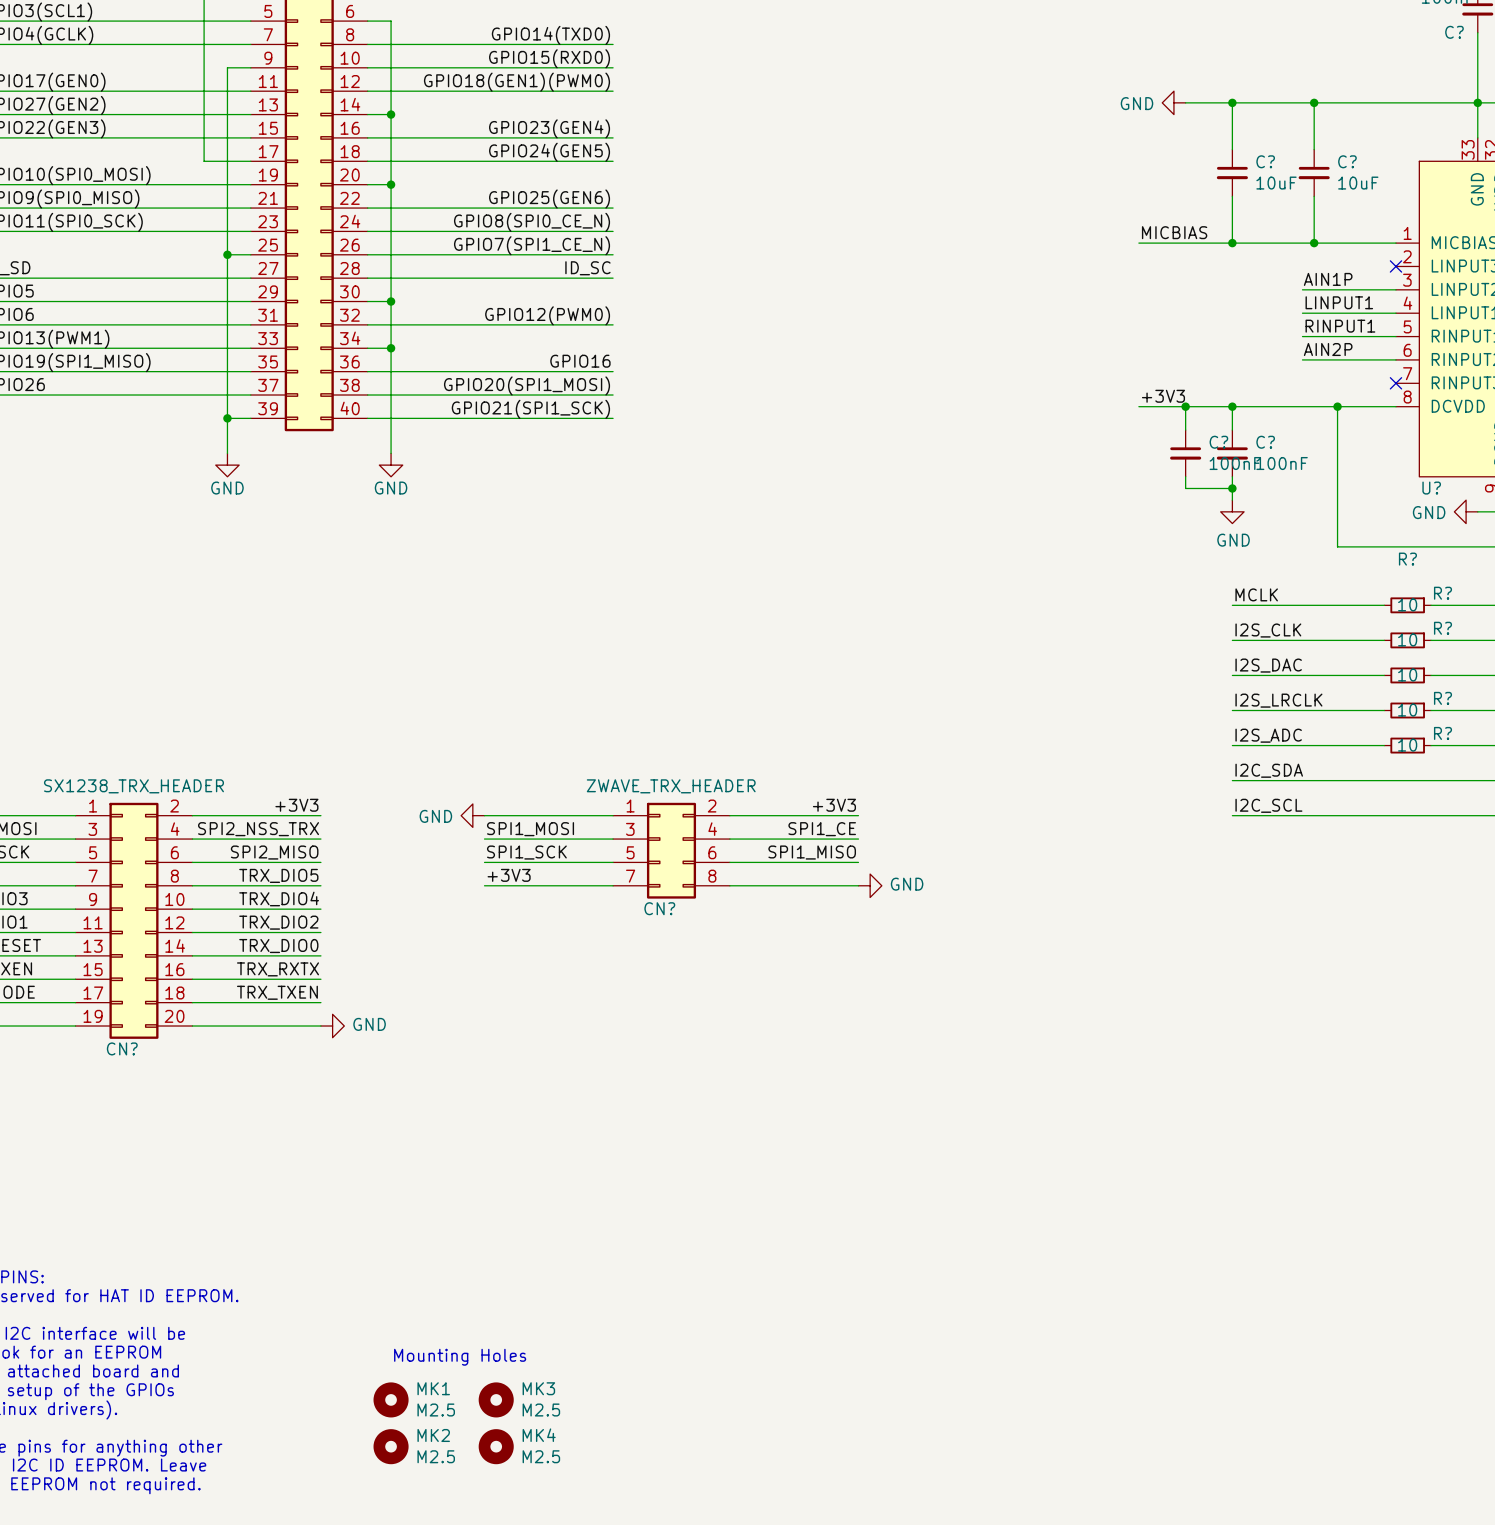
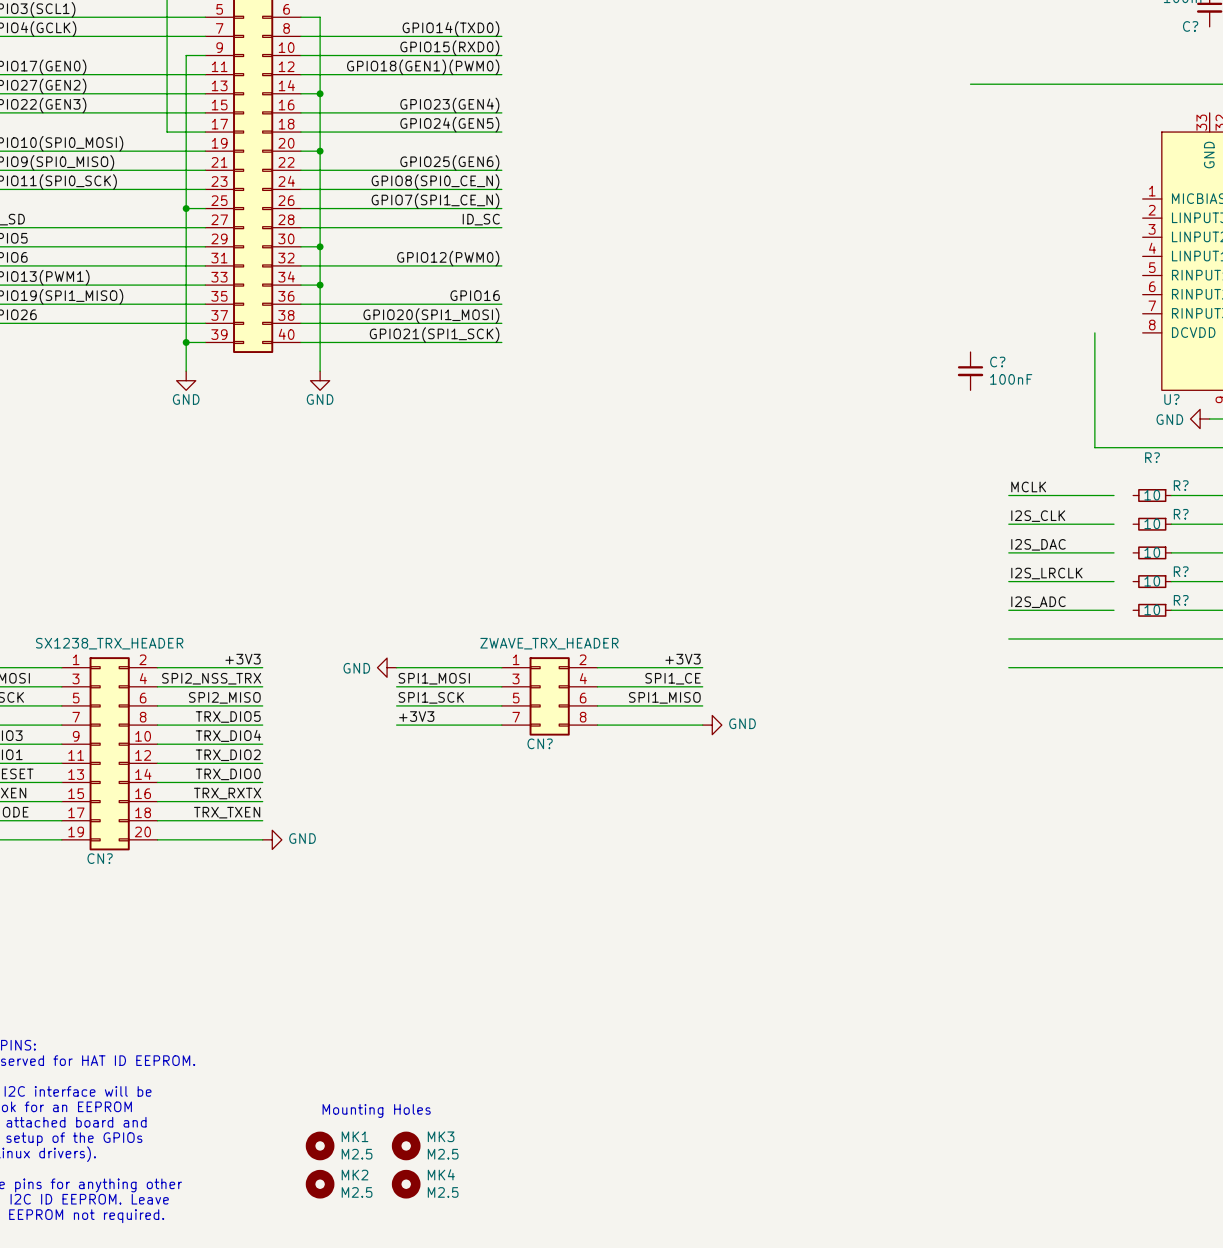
wire: (1477, 32) (1477, 137) -> none
power symbol: GND (1173, 102) -> none
wire: (1232, 102) (1232, 149) -> none
junction: (1232, 102) -> none
wire: (1314, 102) (1314, 149) -> none
junction: (1314, 102) -> none
junction: (1477, 102) -> none
C?: 10uF (1232, 172) -> none
C?: 10uF (1314, 172) -> none
wire: (1232, 196) (1232, 243) -> none
wire: (1314, 196) (1314, 243) -> none
label: MICBIAS (1174, 232) -> none
wire: (1138, 243) (1395, 243) -> none
junction: (1232, 243) -> none
junction: (1314, 243) -> none
no-connect mark: (1395, 266) -> none
label: AIN1P (1328, 279) -> none
wire: (1302, 289) (1395, 289) -> none
label: LINPUT1 (1339, 302) -> none
wire: (1302, 313) (1395, 313) -> none
label: RINPUT1 (1340, 326) -> none
wire: (1302, 336) (1395, 336) -> none
label: AIN2P (1328, 349) -> none
wire: (1302, 359) (1395, 359) -> none
no-connect mark: (1395, 383) -> none
label: +3V3 (1163, 396) -> none
wire: (1138, 406) (1395, 406) -> none
wire: (1185, 406) (1185, 430) -> none
junction: (1185, 406) -> none
wire: (1232, 406) (1232, 430) -> none
junction: (1232, 406) -> none
junction: (1337, 406) -> none
C?: 100nF (1232, 453) -> none
wire: (1185, 476) (1185, 488) (1232, 488) -> none
wire: (1232, 476) (1232, 500) -> none
junction: (1232, 488) -> none
power symbol: GND (1232, 511) -> none
wire: (1360, 605) (1384, 605) -> none
wire: (1360, 640) (1384, 640) -> none
wire: (1360, 675) (1384, 675) -> none
wire: (1360, 710) (1384, 710) -> none
wire: (1360, 745) (1384, 745) -> none
label: I2C_SDA (1269, 770) -> none
label: I2C_SCL (1268, 805) -> none

